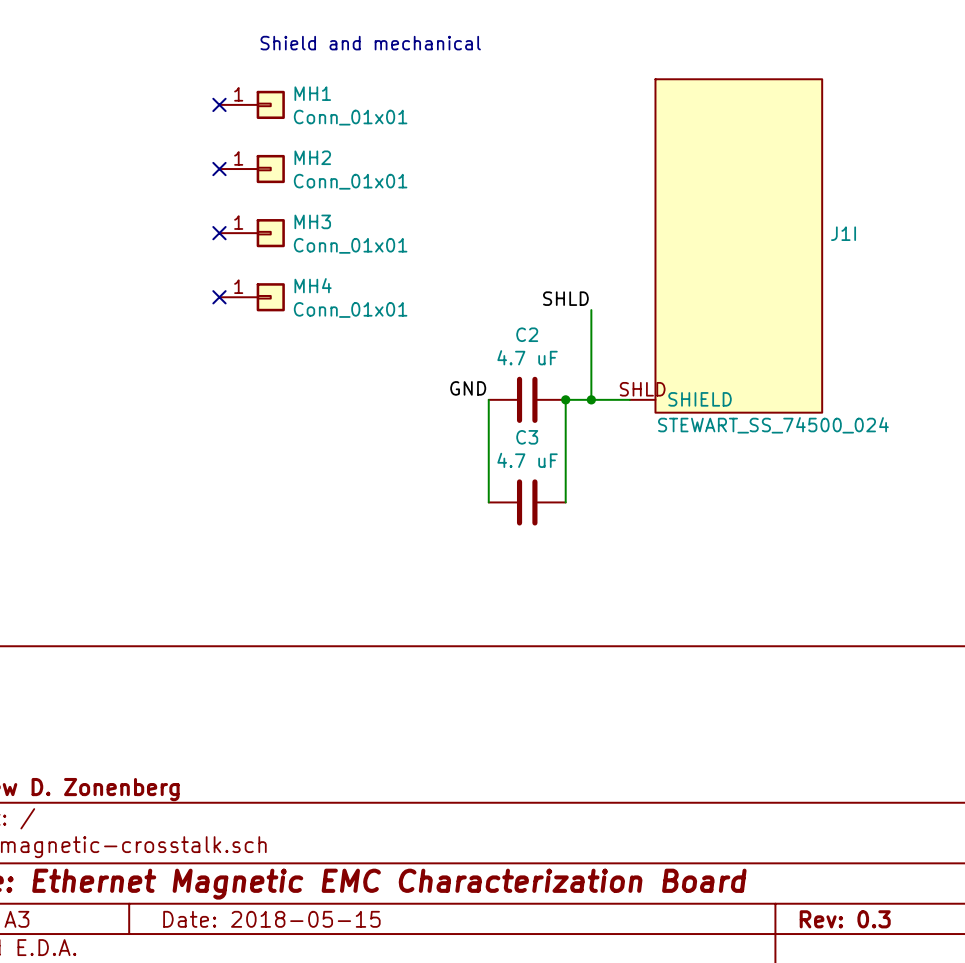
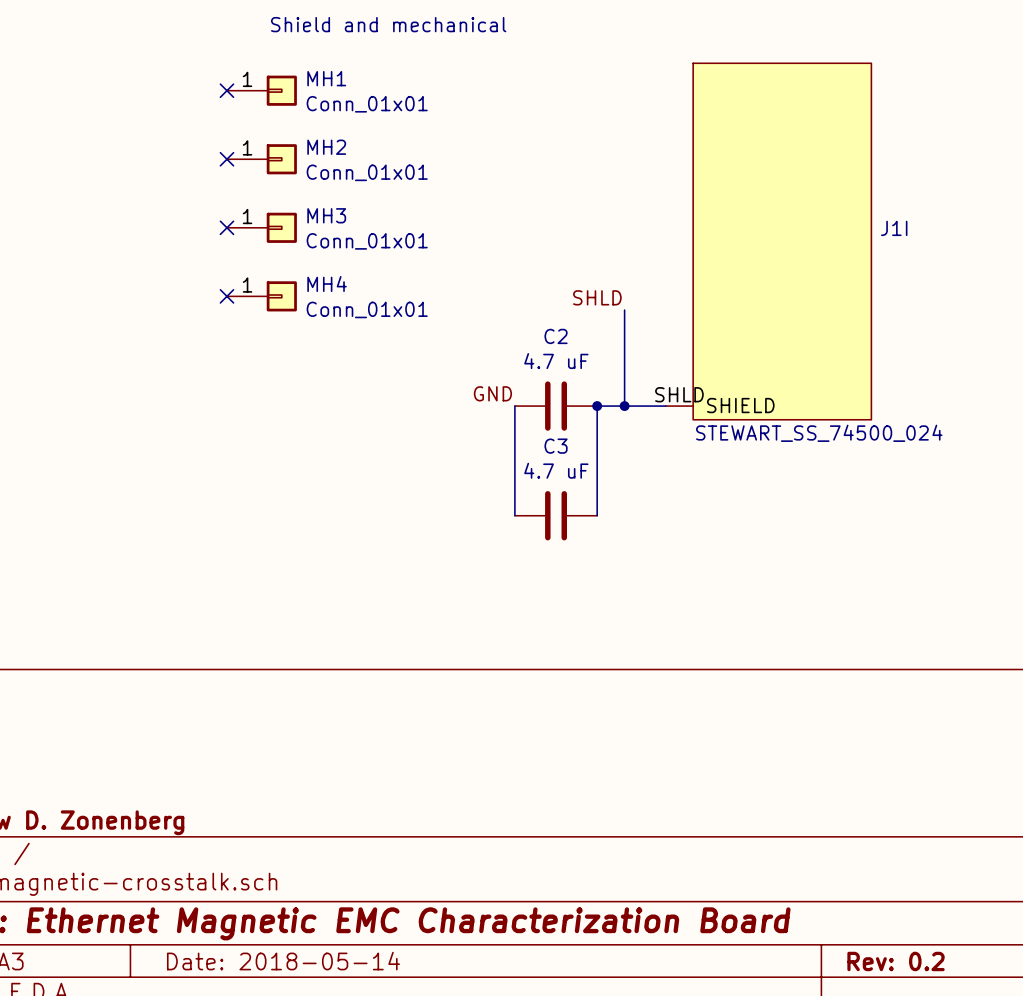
title block: Date: 2018-05-15 (271, 919) -> Date: 2018-05-14 (283, 961)
title block: Rev: 0.3 (845, 919) -> Rev: 0.2 (896, 961)

